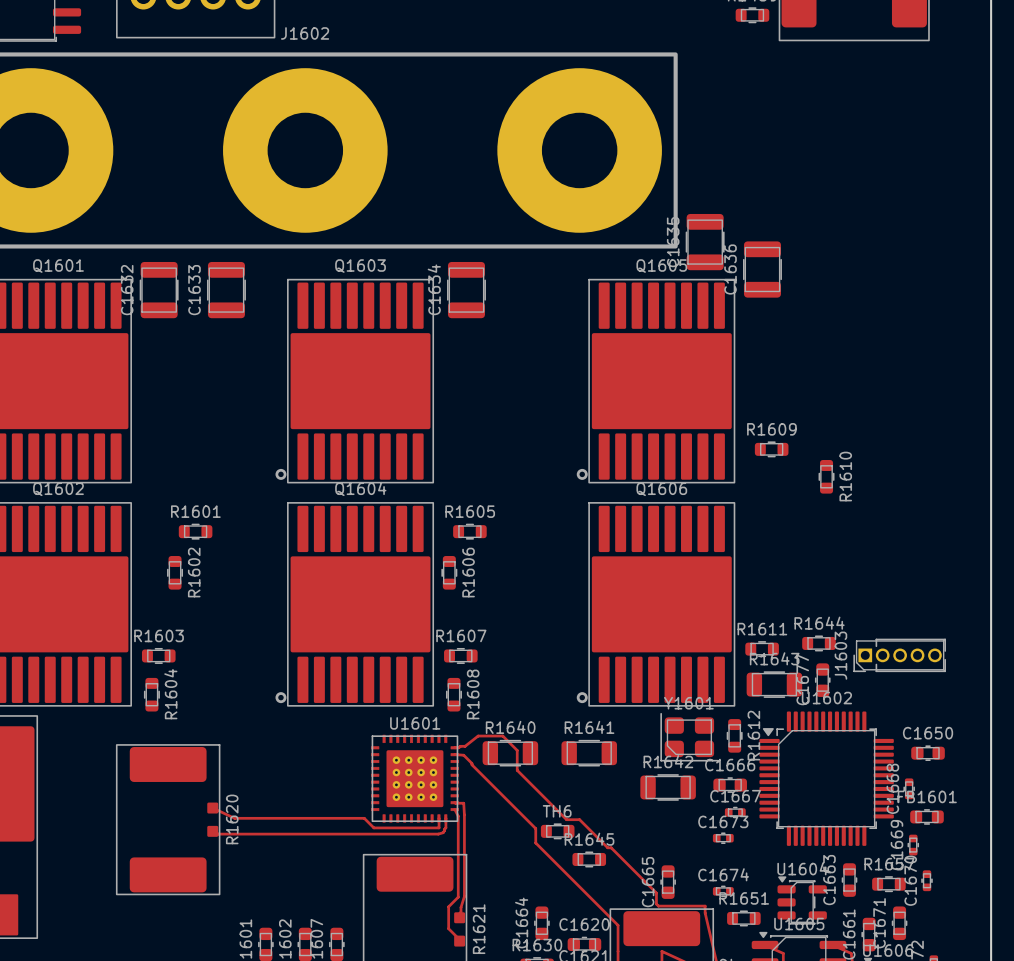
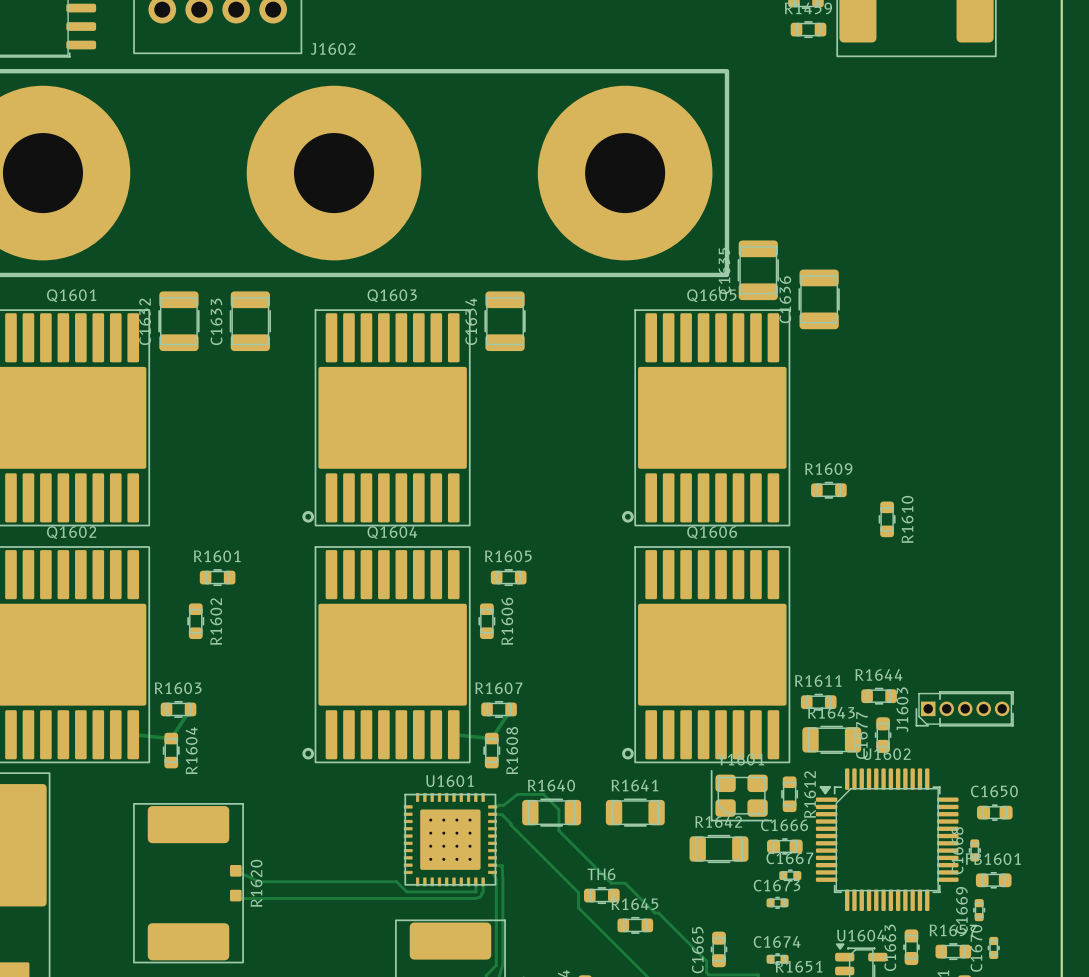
track: none -> (190, 709) (171, 738) (133, 734)
track: none -> (511, 709) (491, 738) (453, 734)

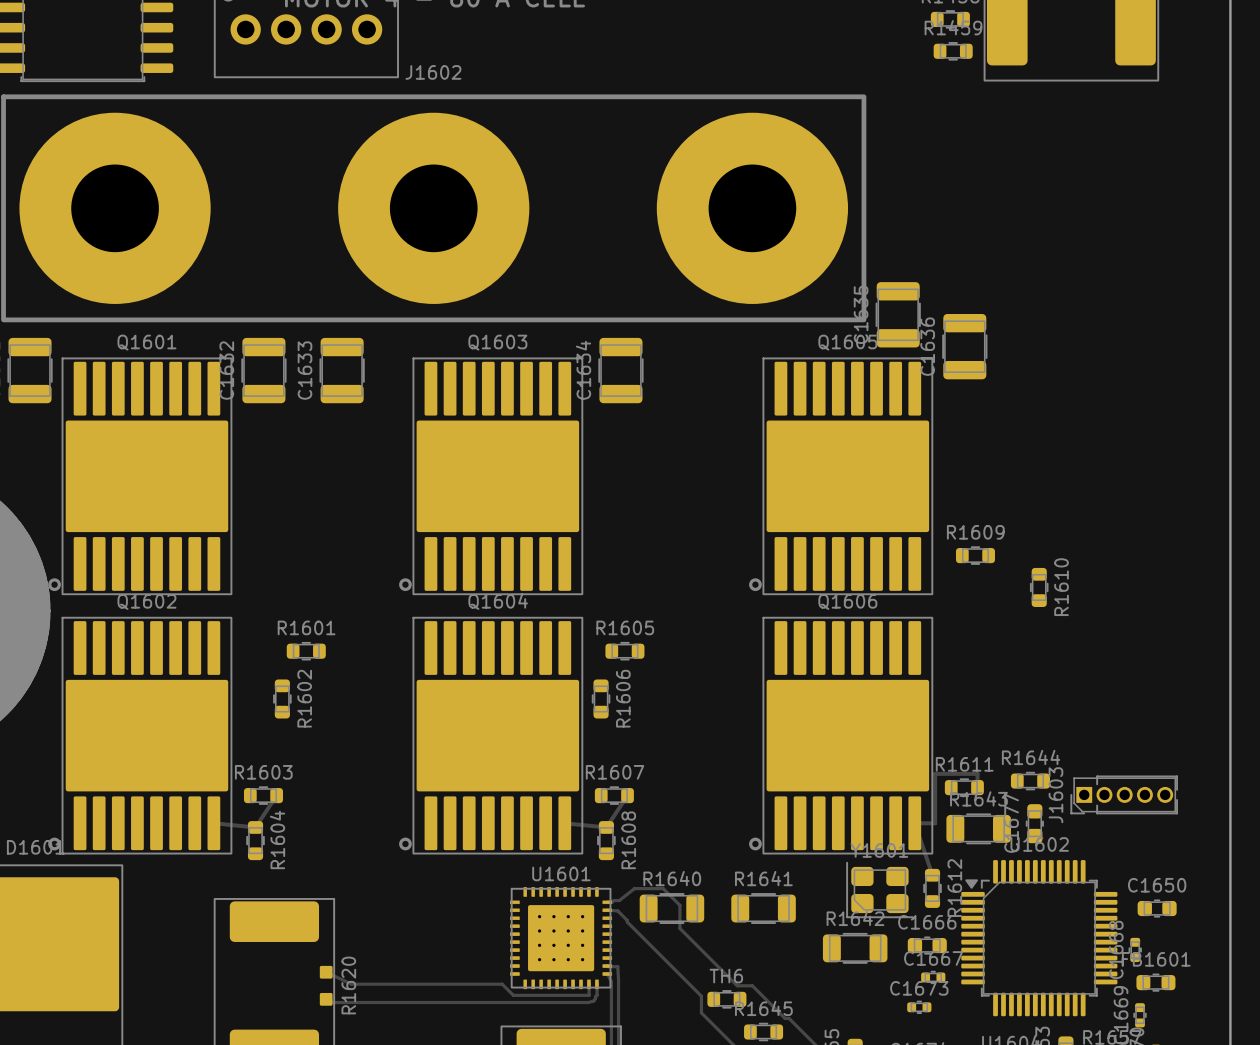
track: none -> (977, 787) (977, 773) (935, 773) (935, 823) (914, 823) (932, 875)

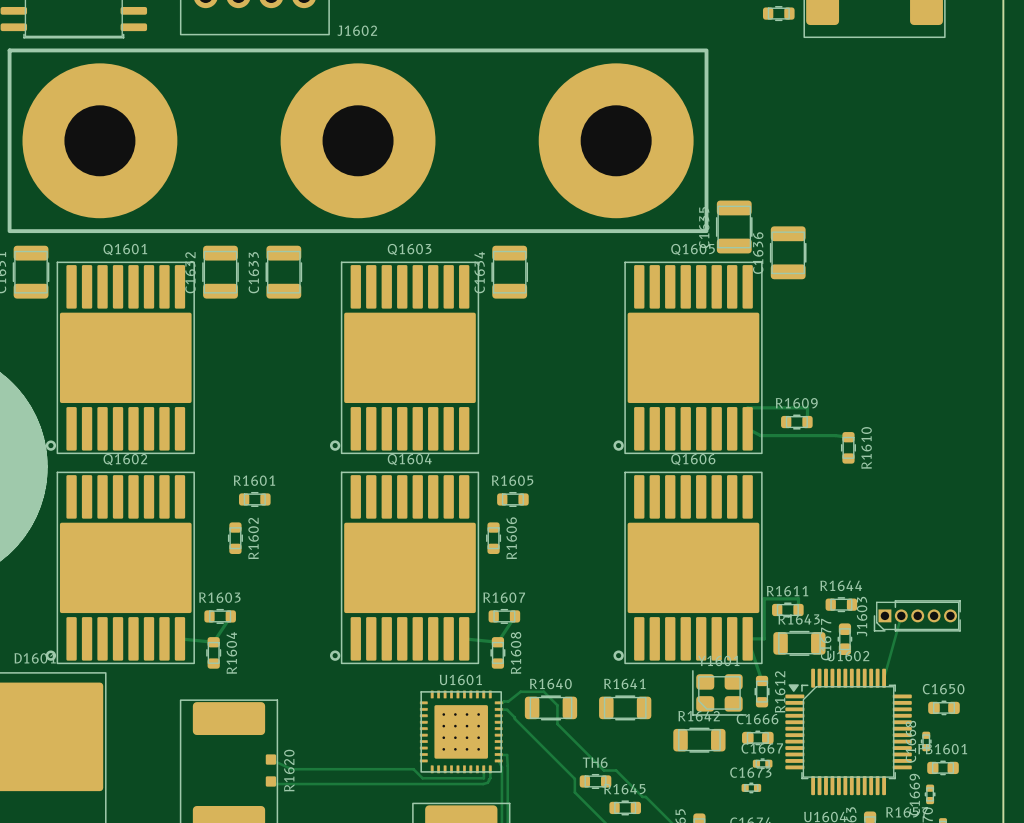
track: none -> (807, 422) (807, 407) (747, 407) (747, 428) (760, 435) (848, 437)
track: none -> (901, 615) (884, 678)

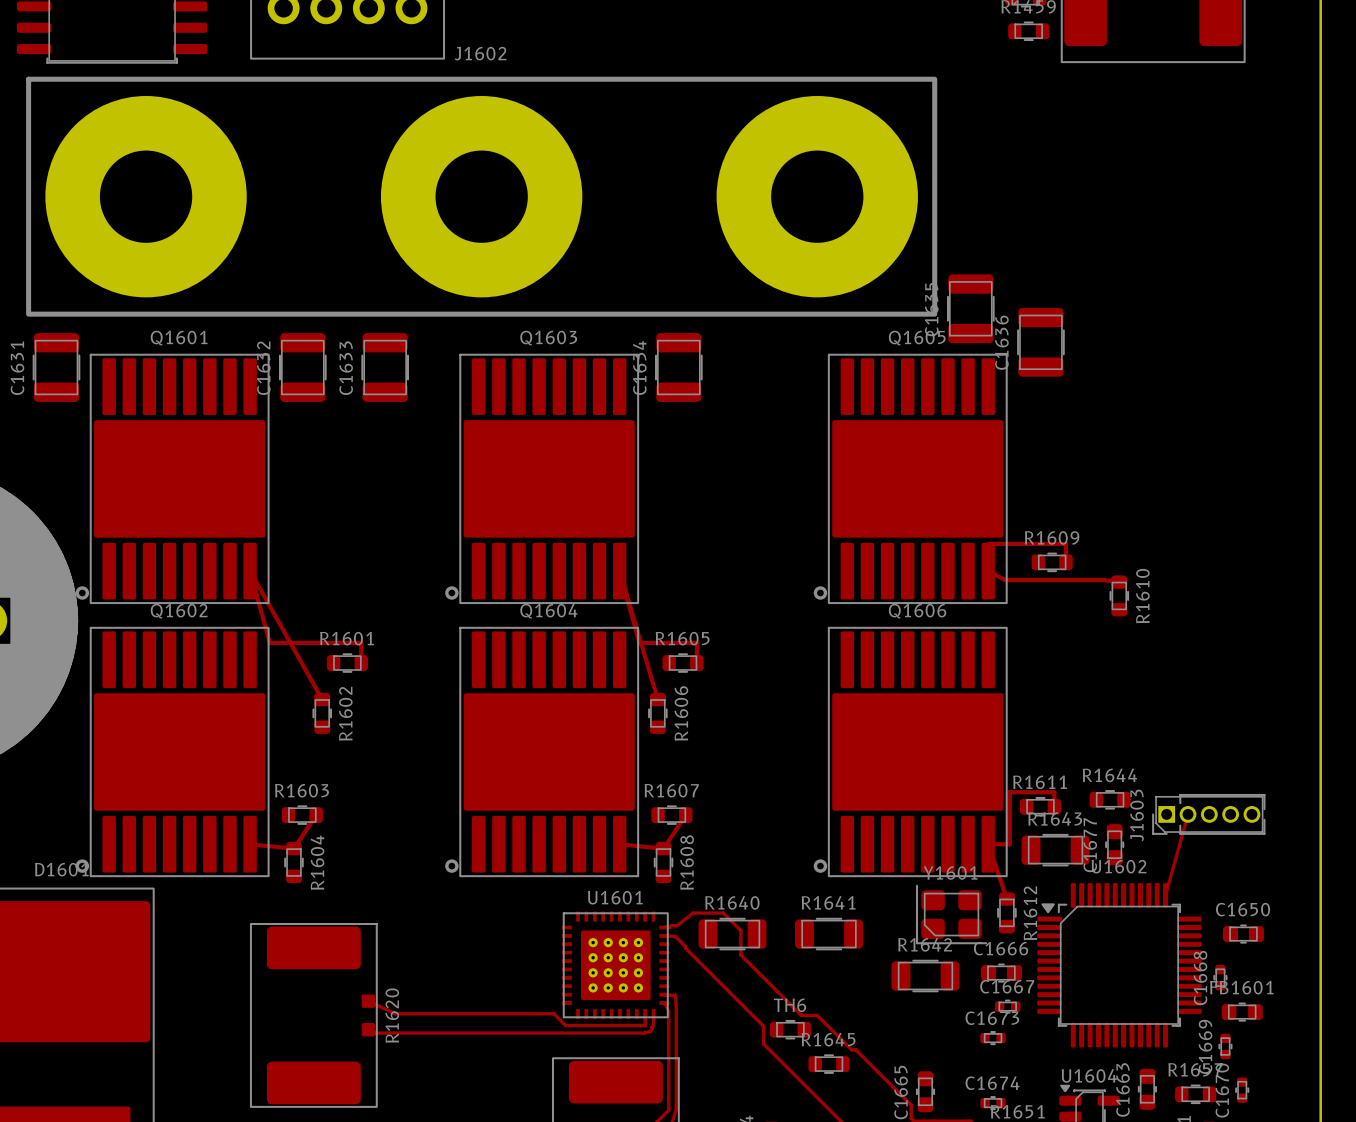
track: none -> (361, 663) (361, 642) (269, 642) (250, 571) (322, 699)
track: none -> (696, 663) (696, 642) (639, 642) (619, 571) (657, 699)

